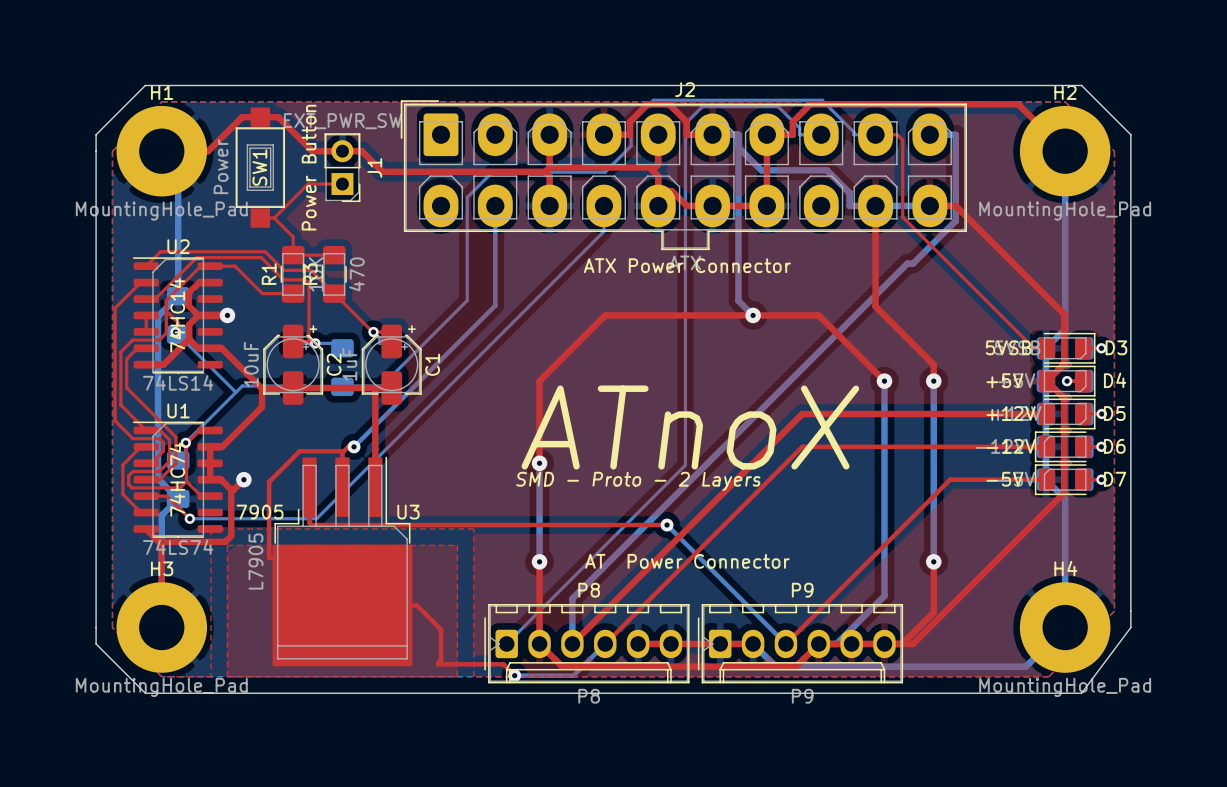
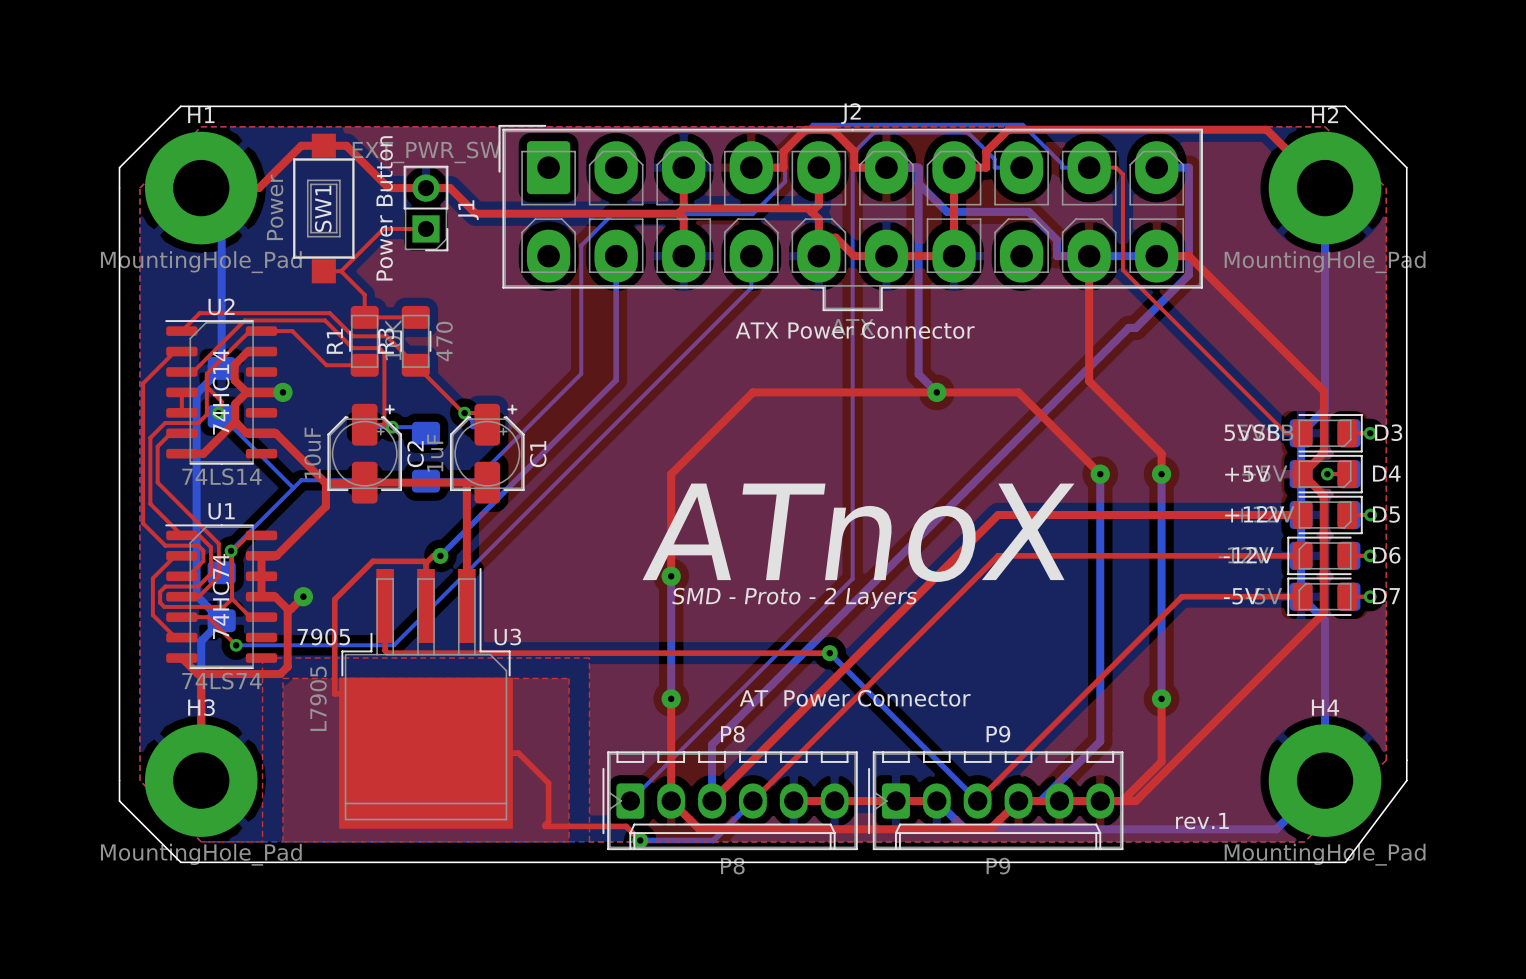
text: none -> rev.1 (1202, 821)

